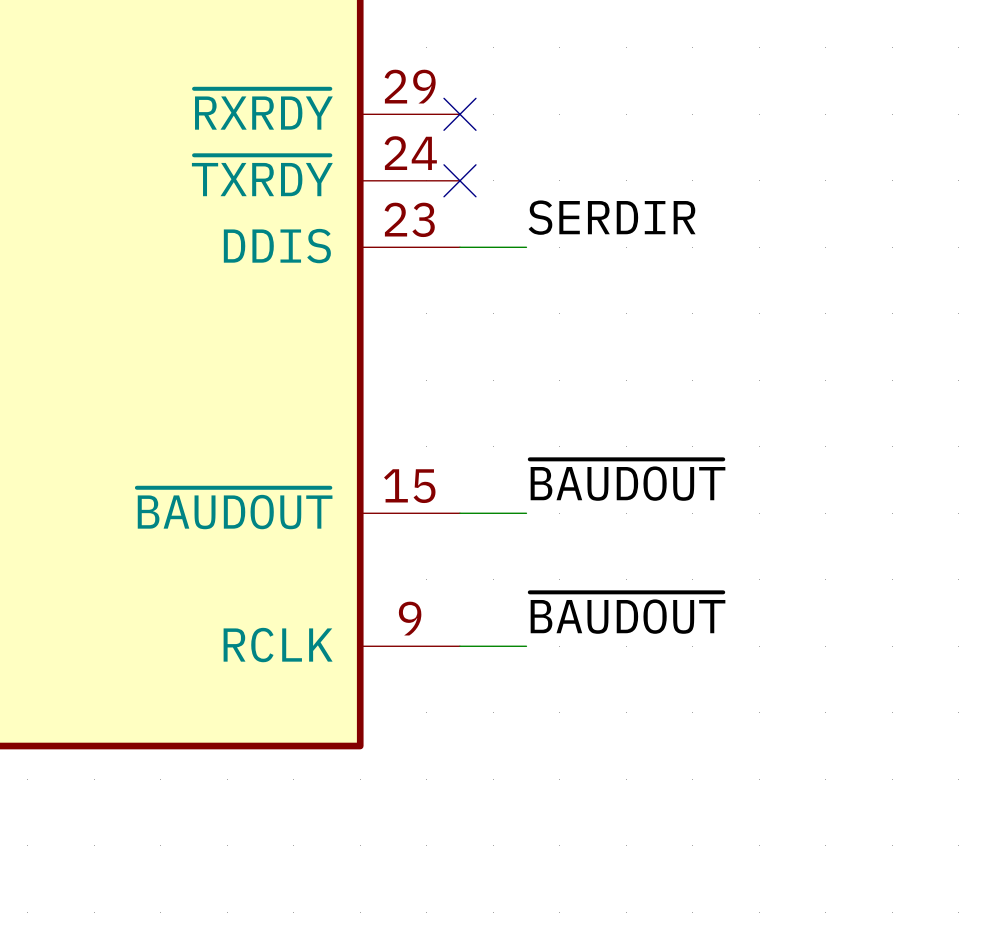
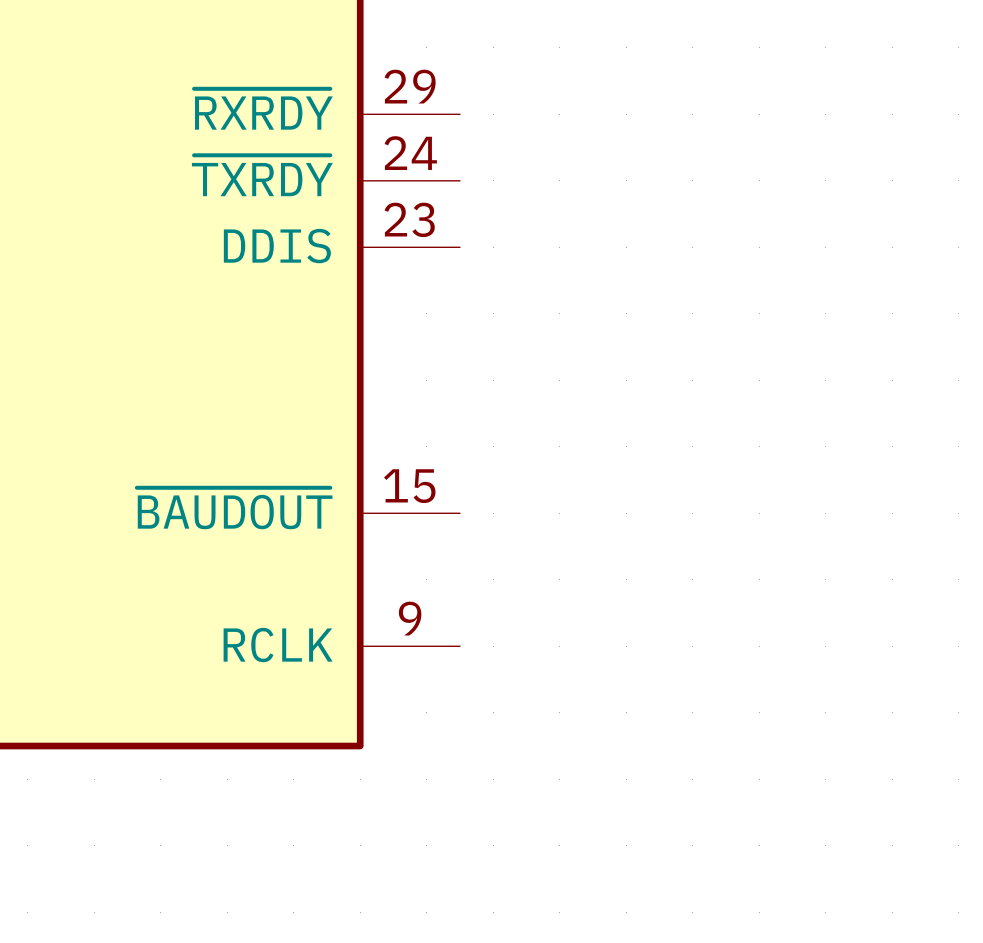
no-connect mark: (459, 114) -> none
no-connect mark: (459, 180) -> none
label: SERDIR (612, 217) -> none
wire: (459, 247) (526, 247) -> none
label: ~{BAUDOUT} (627, 480) -> none
wire: (459, 513) (526, 513) -> none
label: ~{BAUDOUT} (627, 613) -> none
wire: (459, 646) (526, 646) -> none

